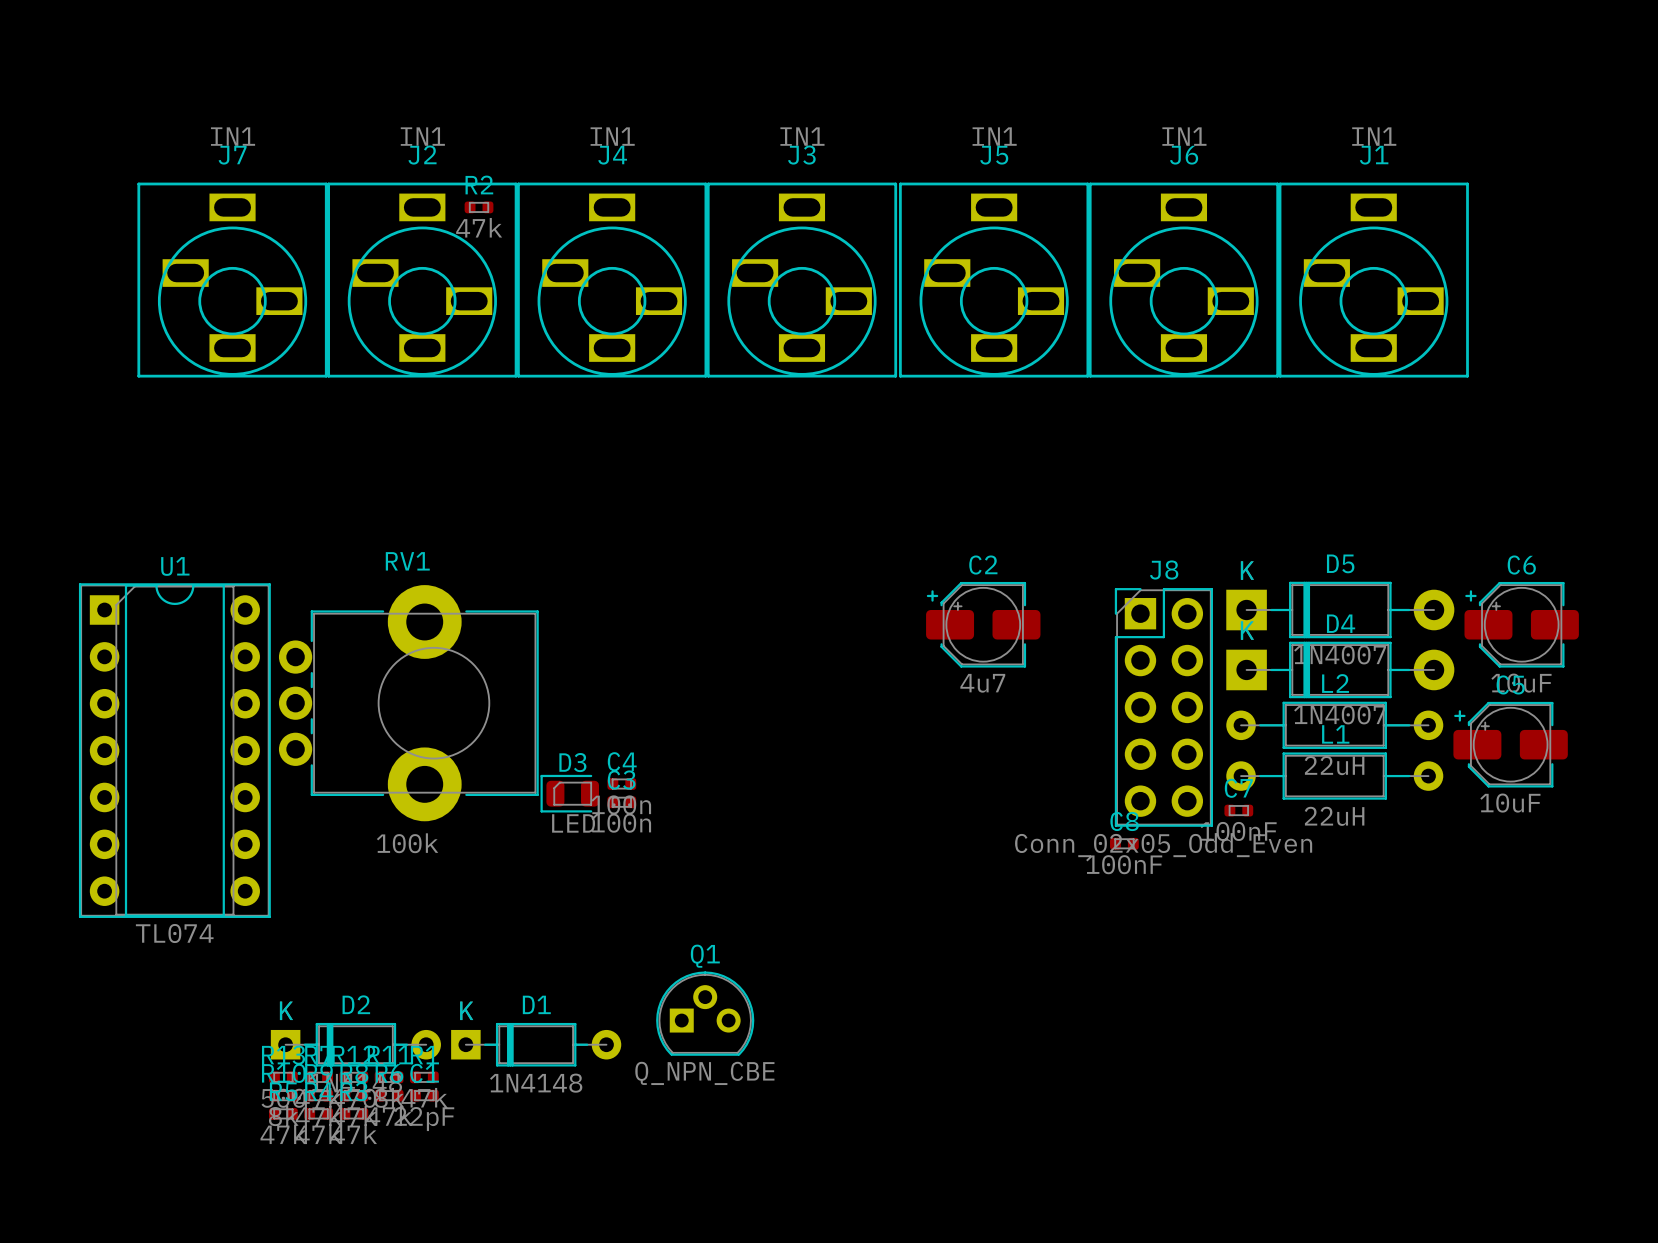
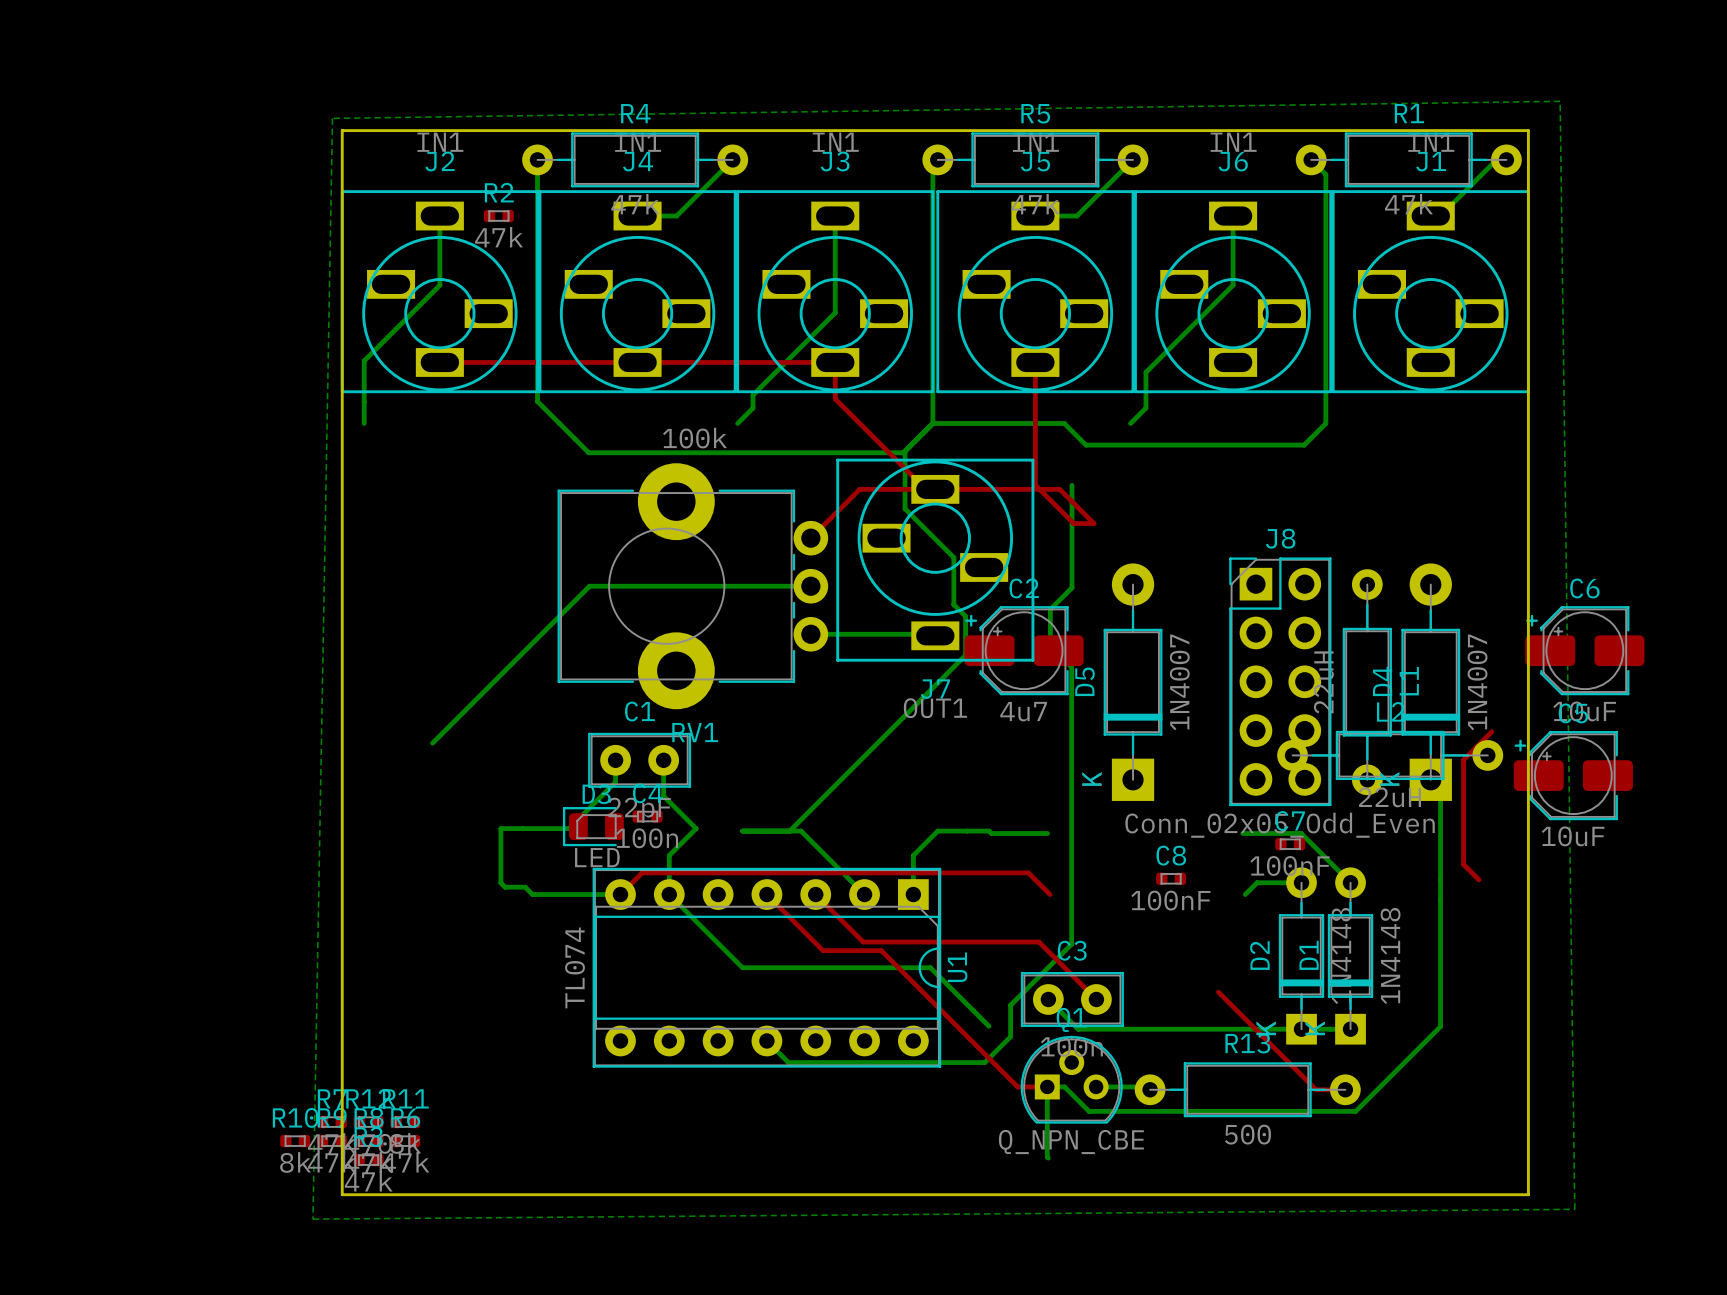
bottom zone outline: none -> (1560, 101) (1574, 1209) (312, 1219) (332, 118) (1560, 101)
board edge: none -> (342, 130) (1528, 130) (1528, 1194) (342, 1194) (342, 130)
J7 value: IN1 (233, 136) -> OUT1 (935, 708)
bottom track: none -> (537, 159) (537, 401) (588, 452) (903, 452) (932, 423)
bottom track: none -> (732, 159) (676, 216) (637, 216)
bottom track: none -> (937, 159) (932, 164) (932, 423)
bottom track: none -> (1133, 159) (1076, 216) (1035, 216)
bottom track: none -> (1311, 159) (1325, 174) (1325, 423) (1304, 445) (1085, 445) (1064, 423) (932, 423)
bottom track: none -> (1506, 159) (1496, 159) (1440, 216) (1430, 216)
bottom track: none -> (439, 216) (439, 285) (364, 360) (364, 423)
bottom track: none -> (835, 216) (835, 312) (753, 395) (753, 408) (737, 423)
bottom track: none -> (1233, 216) (1233, 285) (1145, 372) (1145, 408) (1130, 423)
J7 rotation: 0° (232, 280) -> 180° (935, 560)
J7 position: (232, 280) -> (935, 560)
top track: none -> (439, 362) (835, 362) (835, 398) (925, 489)
top track: none -> (1035, 362) (1035, 485) (1073, 523) (1093, 523) (1059, 489) (859, 489) (810, 538)
bottom track: none -> (905, 451) (905, 508) (953, 557) (953, 604) (965, 616) (965, 655) (789, 831)
bottom track: none -> (1072, 485) (1072, 587) (1050, 609) (1050, 646) (1071, 667) (1071, 944) (1010, 1005) (1010, 1036) (984, 1062) (788, 1062) (766, 1040)
bottom track: none -> (810, 586) (589, 586) (432, 743)
bottom track: none -> (810, 634) (933, 634) (935, 635)
D5 rotation: 0° (1340, 610) -> 90° counterclockwise (1133, 682)
D5 position: (1340, 610) -> (1133, 682)
D4 rotation: 0° (1340, 669) -> 90° counterclockwise (1430, 682)
top track: none -> (1491, 731) (1463, 759) (1463, 864) (1478, 879)
RV1 rotation: 0° (408, 703) -> 180° (692, 586)
RV1 position: (408, 703) -> (692, 586)
J8 position: (1163, 707) -> (1280, 681)
bottom track: none -> (615, 760) (615, 782) (569, 828) (500, 828) (500, 882) (505, 887) (525, 887) (532, 894) (620, 894)
bottom track: none -> (663, 760) (663, 796) (696, 828) (669, 855) (669, 894) (742, 967) (930, 967) (989, 1026)
bottom track: none -> (1430, 779) (1440, 789) (1440, 1026) (1355, 1111) (1089, 1111) (1064, 1086) (1047, 1086) (1048, 1158)
U1 rotation: 0° (174, 750) -> 90° clockwise (766, 967)
U1 position: (174, 750) -> (766, 967)
L1 rotation: 0° (1334, 776) -> 90° clockwise (1367, 682)
C3 footprint: [607, 796, 637, 809] -> [1020, 971, 1124, 1027]
bottom track: none -> (742, 831) (801, 831) (864, 894)
bottom track: none -> (1047, 833) (937, 831) (913, 855) (913, 894)
bottom track: none -> (1242, 833) (1301, 833) (1350, 882)
bottom track: none -> (1301, 882) (1257, 882) (1245, 894)
top track: none -> (620, 894) (642, 872) (1028, 872) (1050, 894)
top track: none -> (766, 894) (823, 950) (881, 950) (1017, 1086) (1047, 1086)
top track: none -> (815, 894) (863, 942) (1038, 942) (1096, 999)
top track: none -> (1218, 992) (1316, 1089) (1345, 1089)
bottom track: none -> (1048, 999) (1078, 1029) (1350, 1029)
Q1 position: (705, 1013) -> (1071, 1079)
bottom track: none -> (1096, 1086) (1147, 1086) (1150, 1089)
D2 rotation: 0° (355, 1044) -> 90° counterclockwise (1301, 955)
D2 position: (355, 1044) -> (1301, 955)
D1 rotation: 0° (536, 1044) -> 90° counterclockwise (1350, 955)
D1 position: (536, 1044) -> (1350, 955)
R13 footprint: [269, 1071, 298, 1084] -> [1134, 1062, 1361, 1118]
R1 footprint: [409, 1071, 439, 1084] -> [1295, 132, 1522, 188]
C1 footprint: [409, 1089, 439, 1102] -> [588, 732, 692, 788]
R5 footprint: [269, 1108, 298, 1120] -> [922, 132, 1149, 188]
R4 footprint: [304, 1108, 334, 1120] -> [522, 132, 749, 188]

